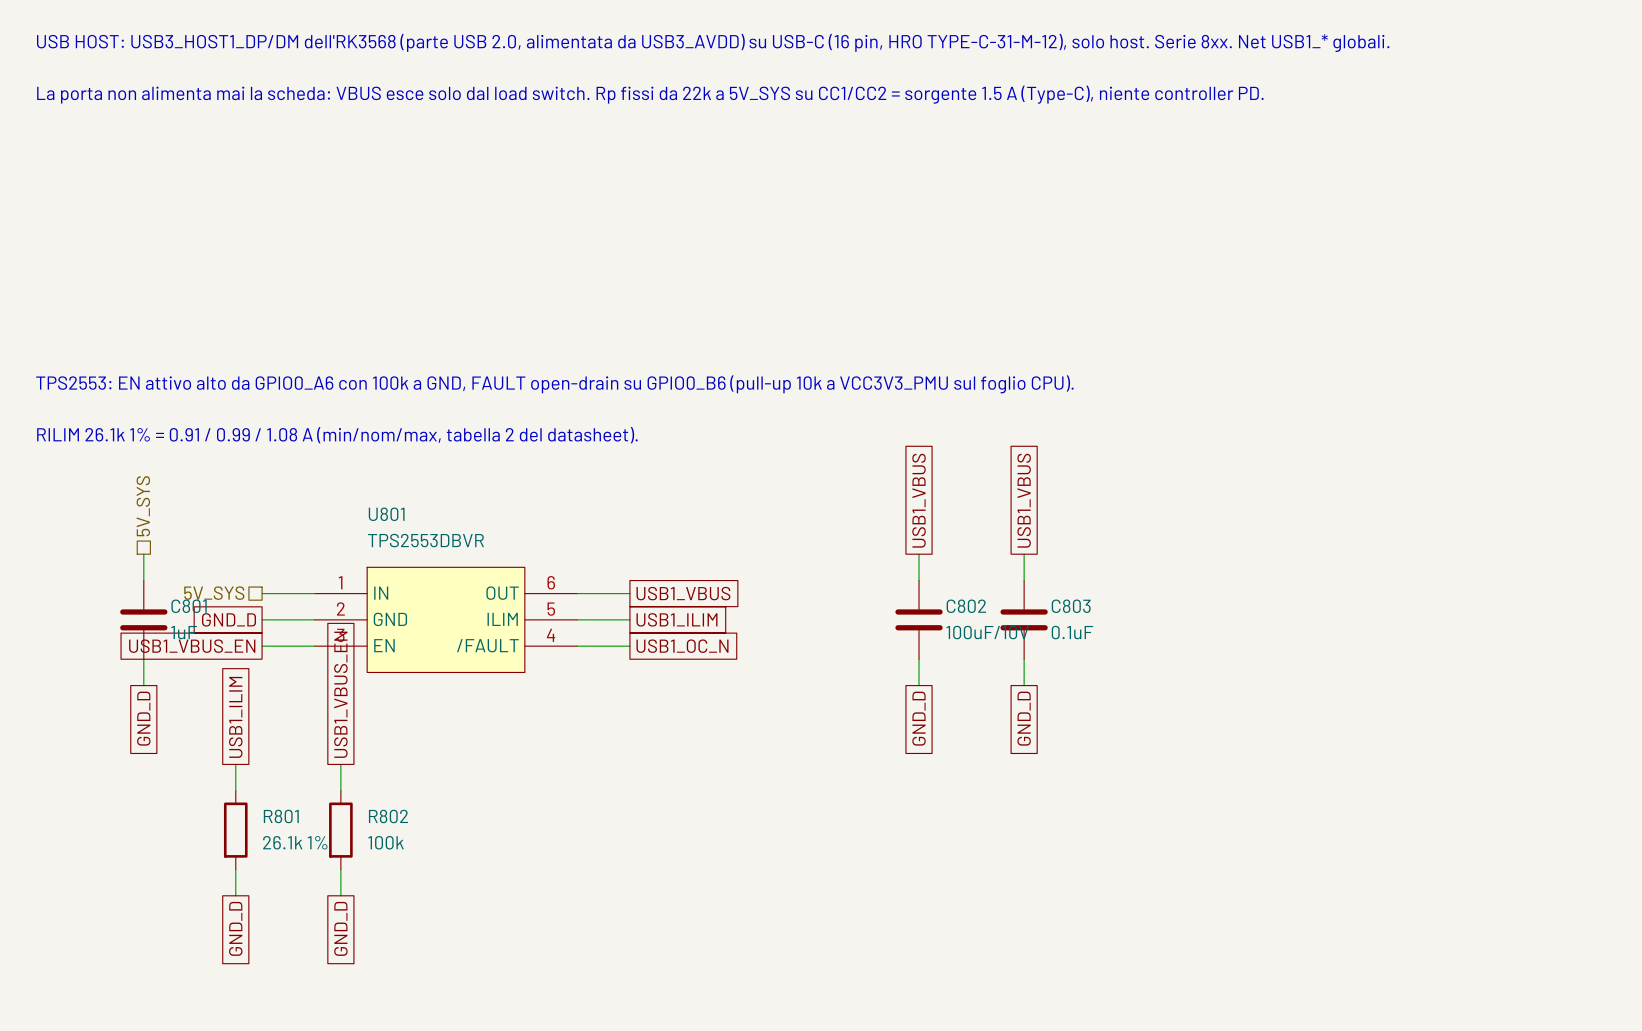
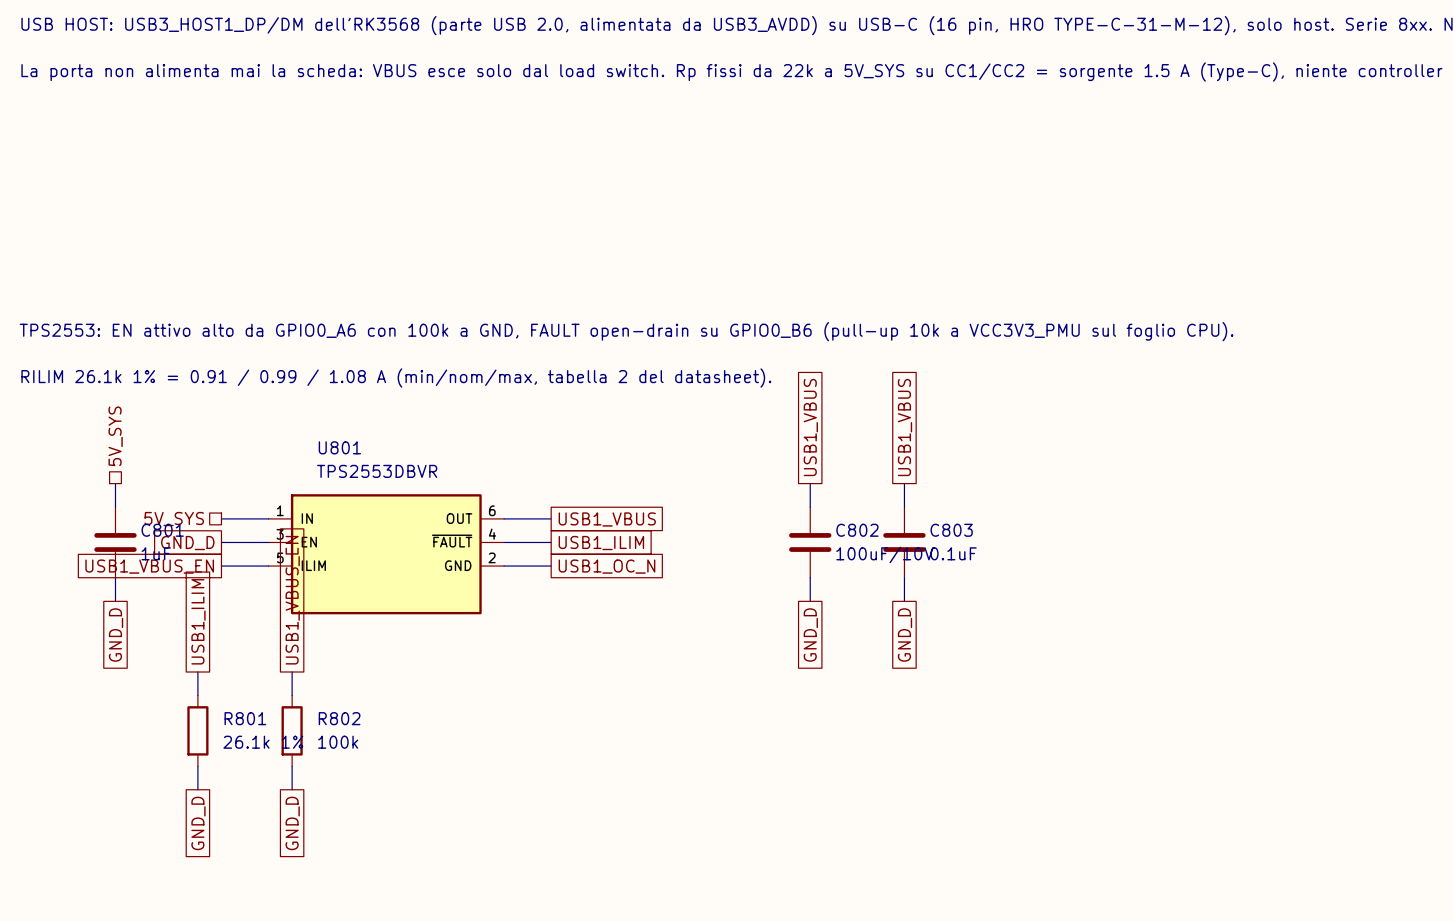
U801 symbol: [314, 567, 578, 673] -> [268, 494, 505, 615]

